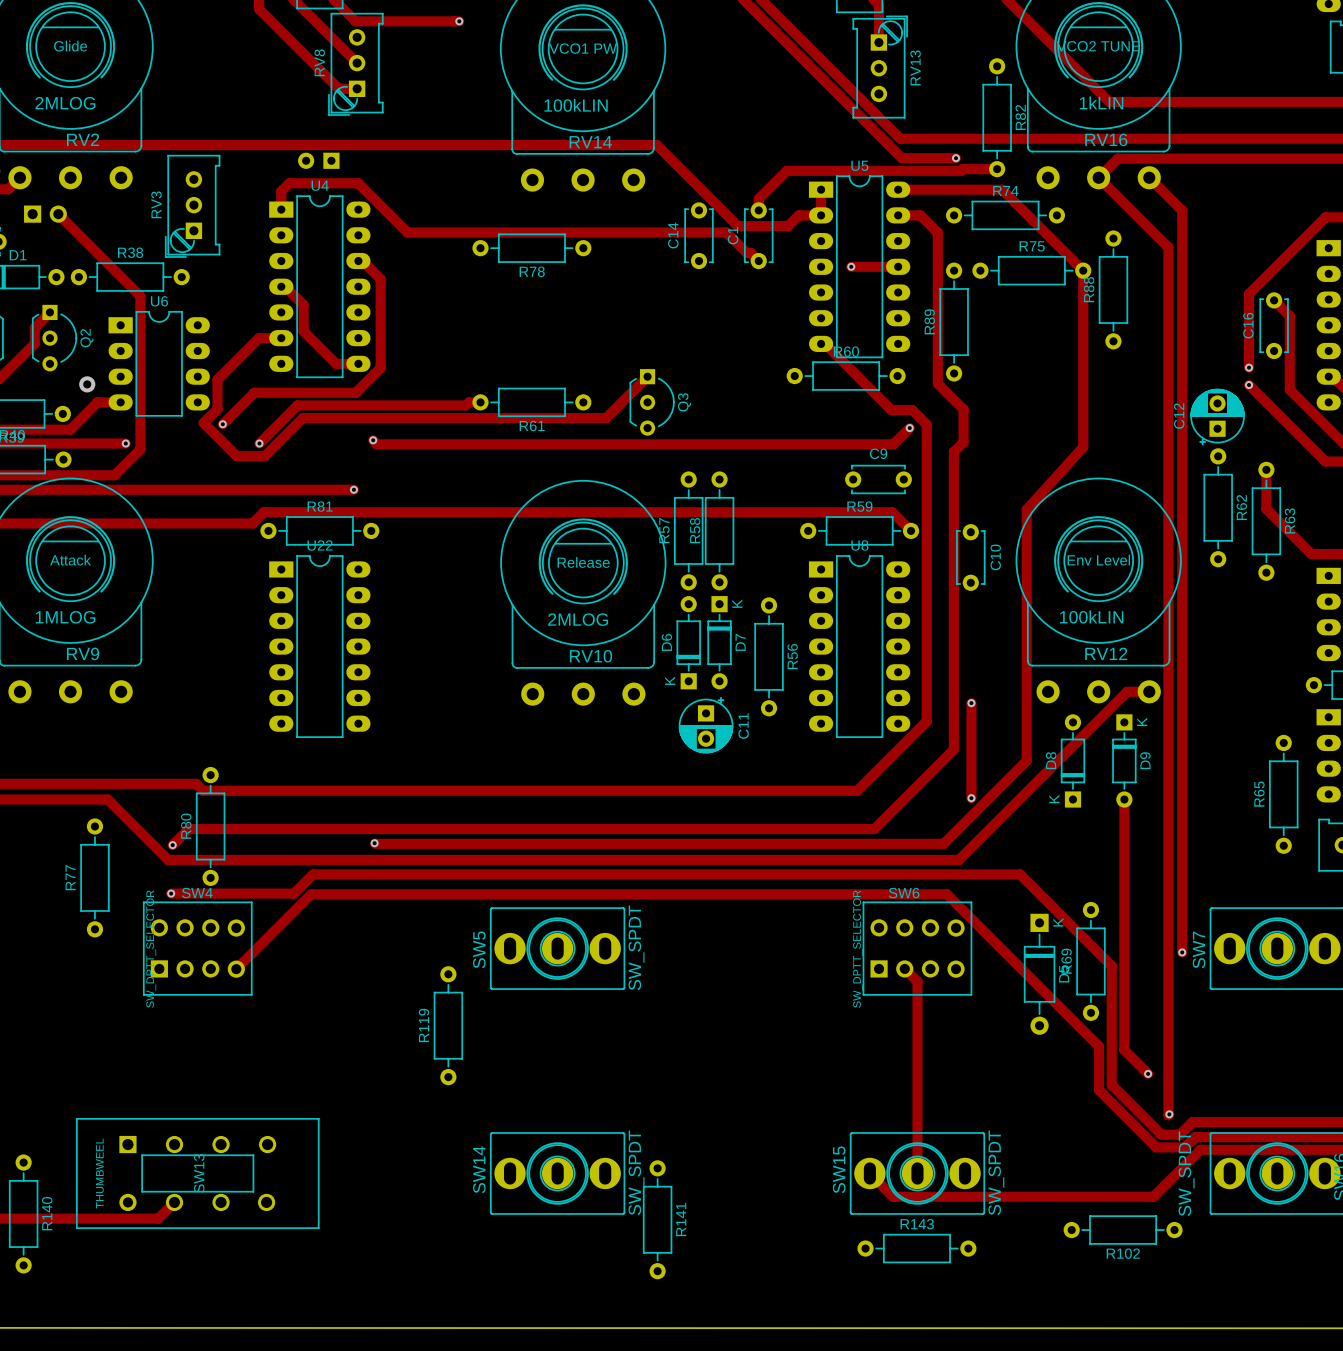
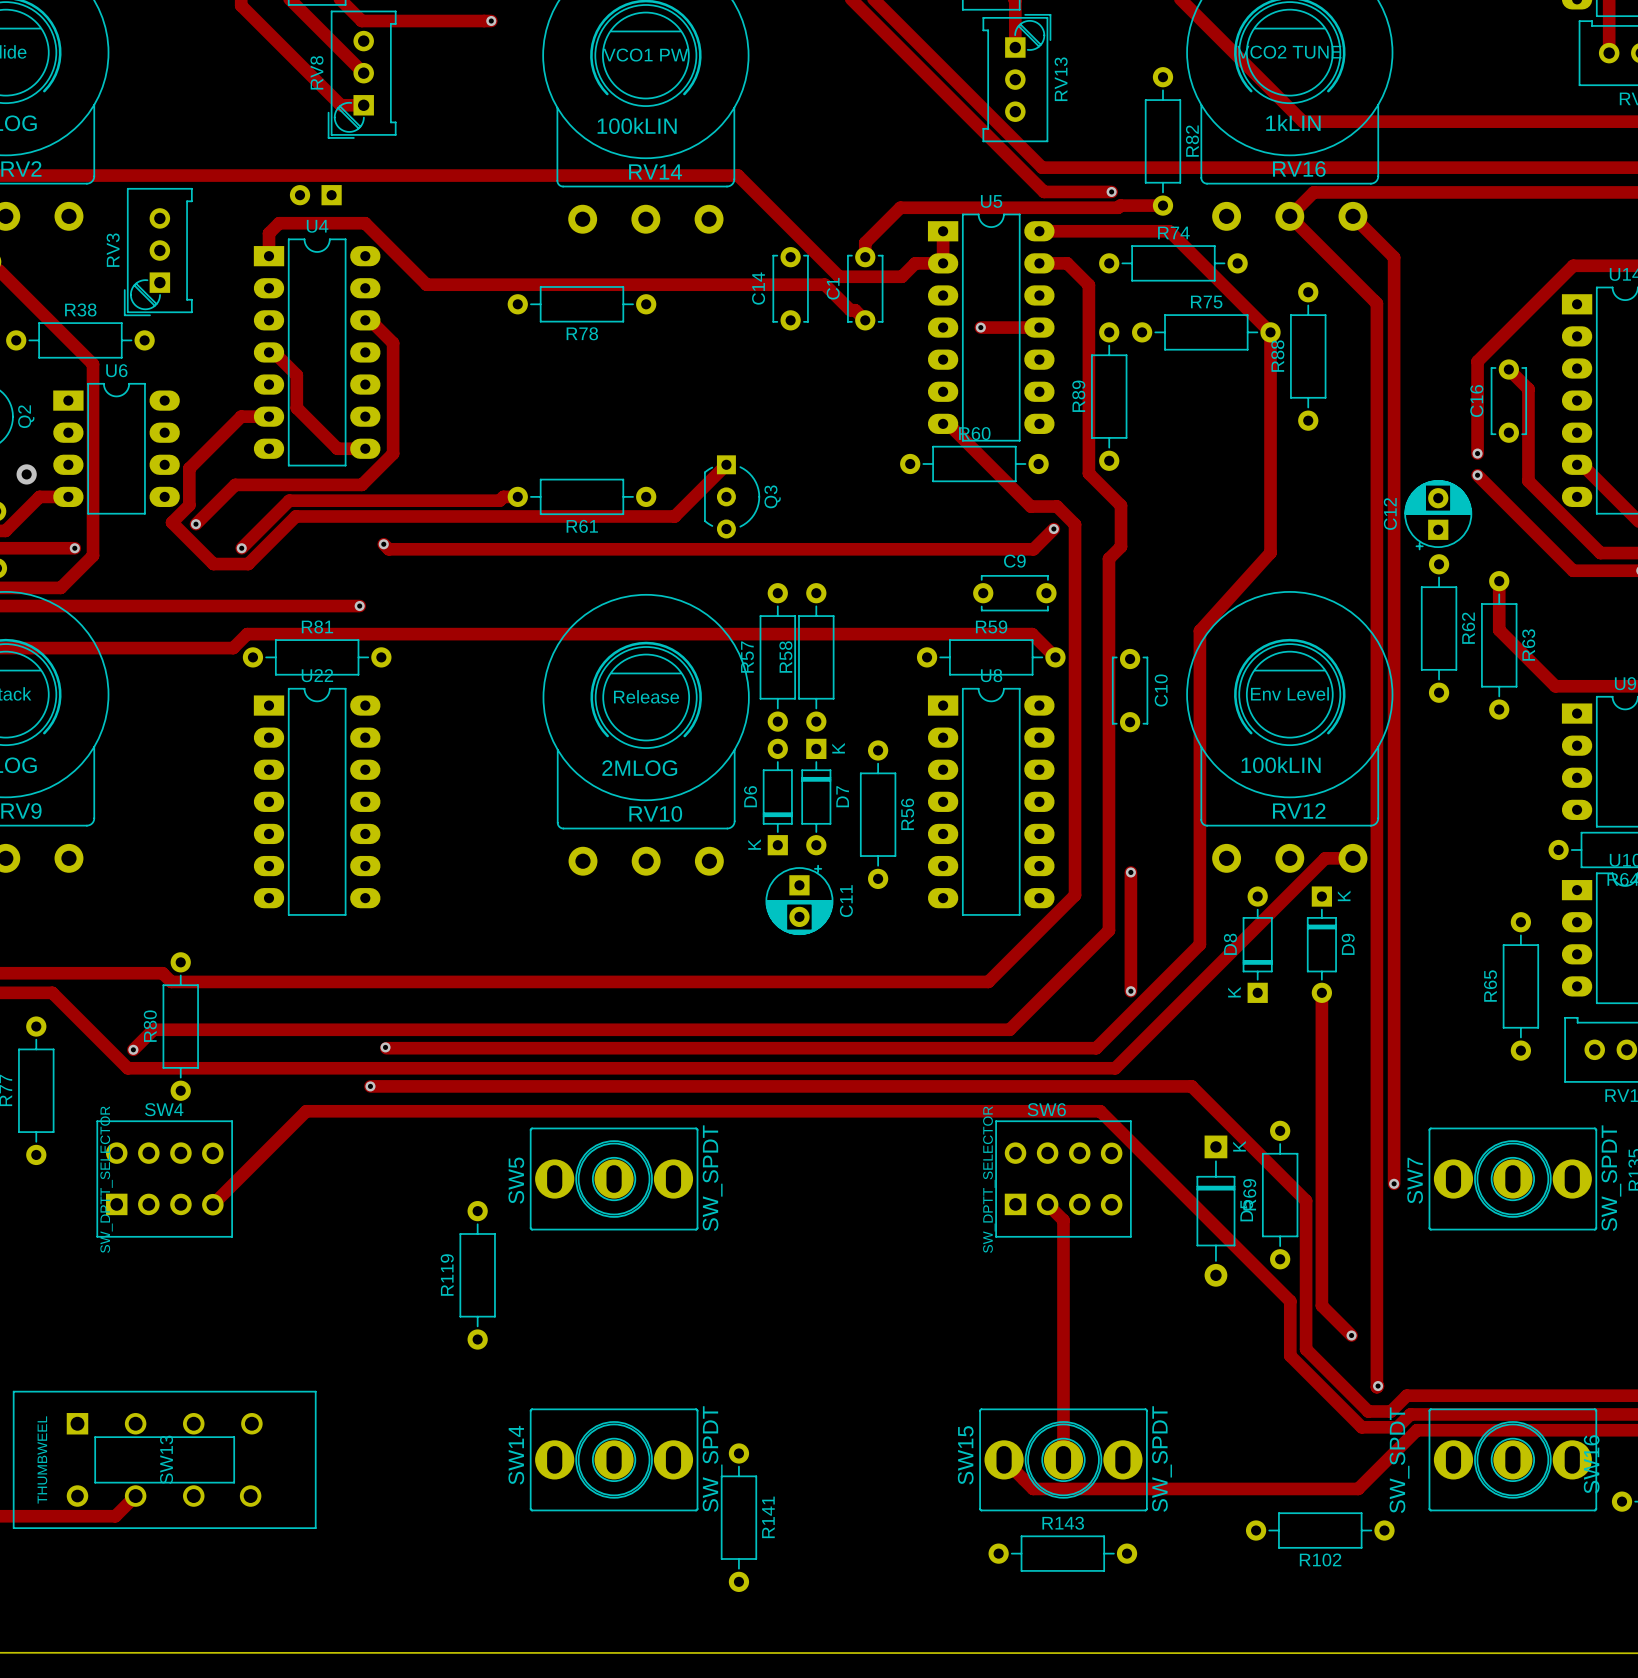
track: (362, 874) (313, 874) (294, 893) (171, 893) -> none
via: none -> (370, 1086)
via: (171, 893) -> none

